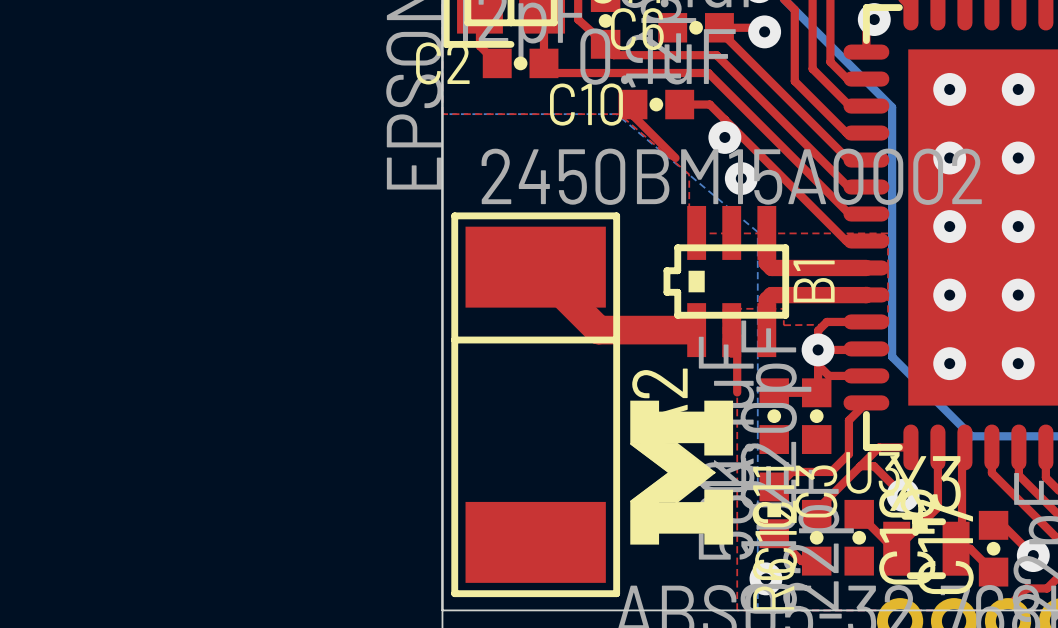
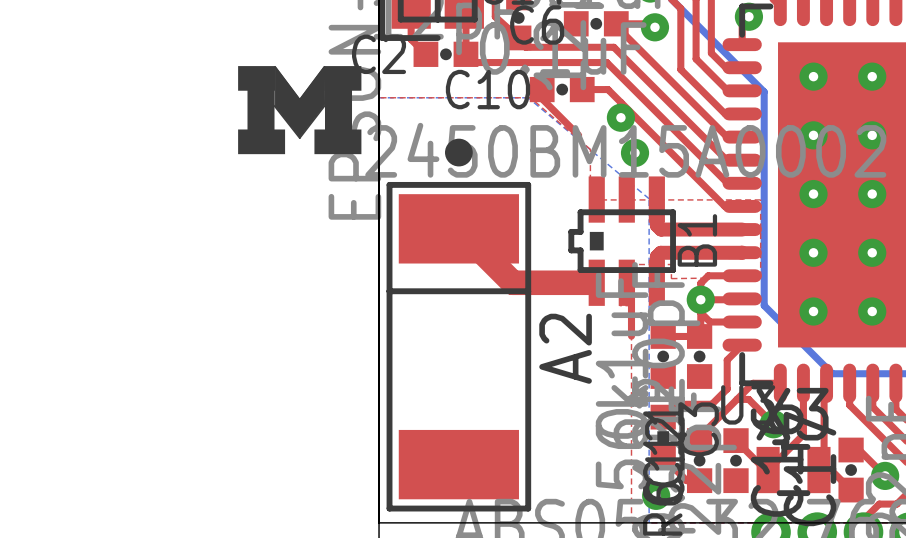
drawing: none -> [238, 66, 362, 155]
A2 footprint: [451, 212, 621, 598] -> [386, 138, 532, 512]
drawing: [630, 400, 734, 545] -> none

